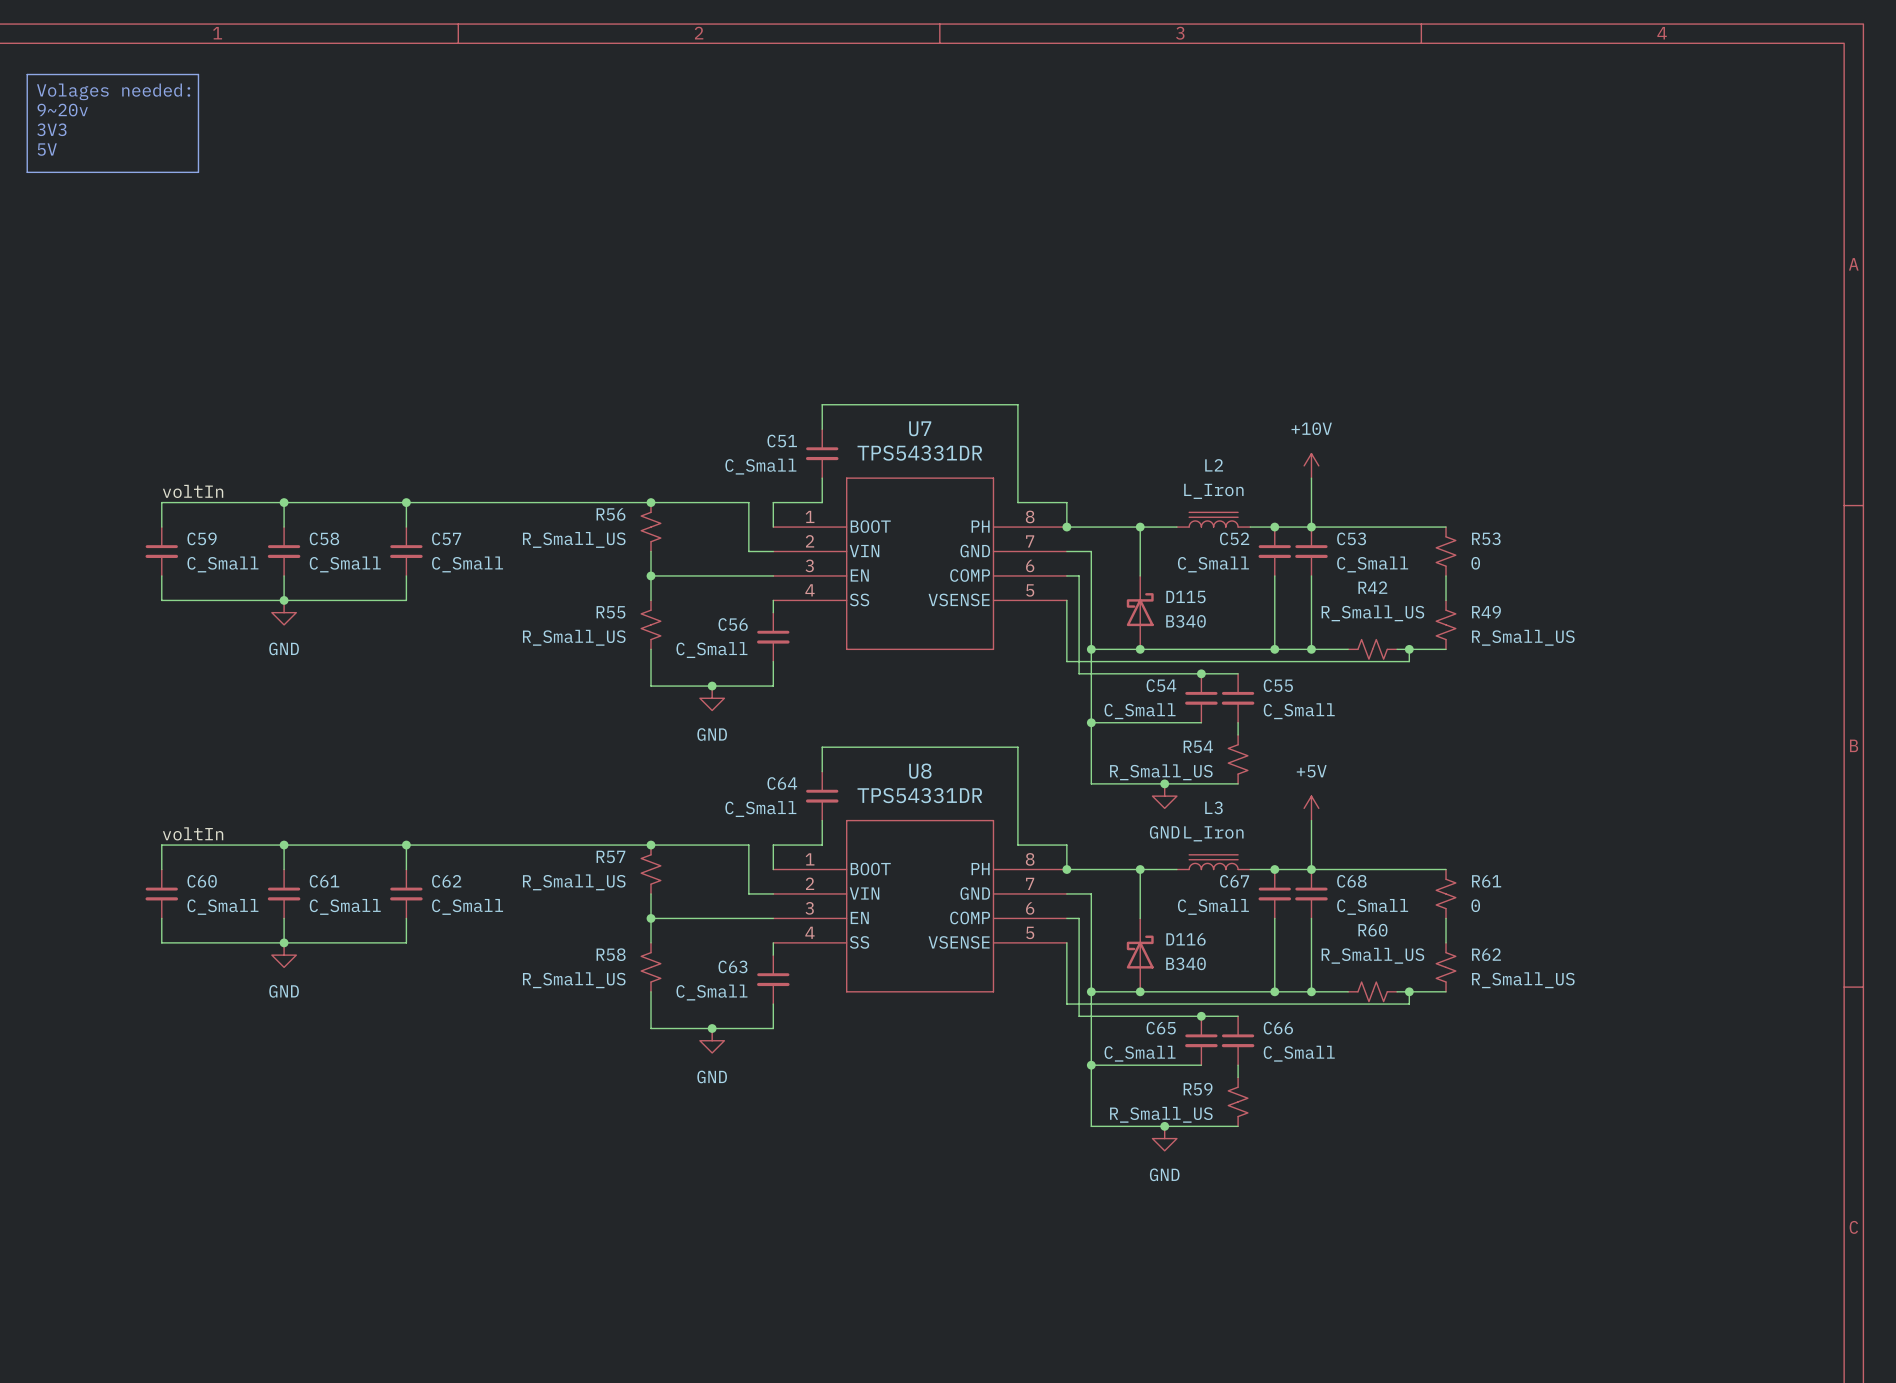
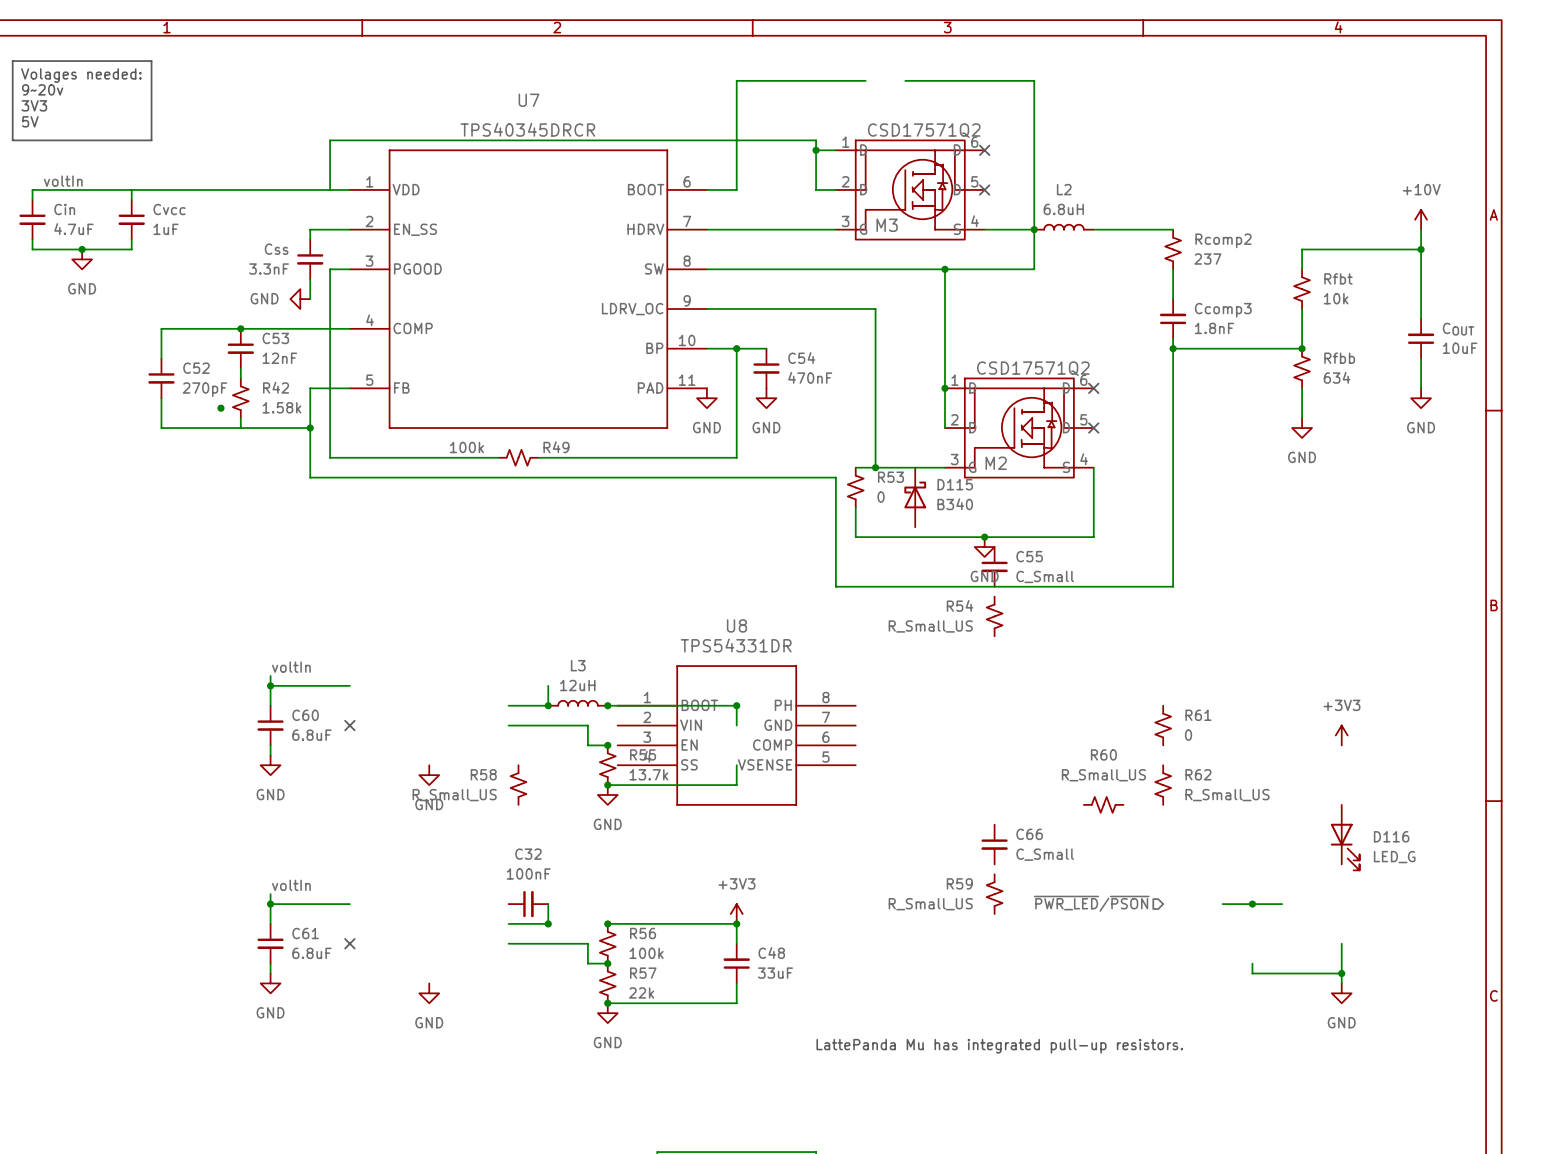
wire: none -> (865, 80) (736, 80) (736, 189) (706, 189)
wire: none -> (905, 80) (1034, 80) (1034, 269) (706, 269)
wire: none -> (816, 150) (835, 150)
junction: none -> (816, 150)
no-connect mark: none -> (984, 150)
label: none -> voltIn (63, 181)
wire: none -> (131, 189) (131, 199)
wire: none -> (330, 189) (330, 140) (816, 140) (816, 189) (835, 189)
wire: none -> (349, 189) (32, 189) (32, 199)
M3: none -> CSD17571Q2 (910, 189)
no-connect mark: none -> (984, 189)
Cin: none -> 4.7uF (32, 219)
Cvcc: none -> 1uF (131, 219)
power symbol: none -> +10V (1421, 219)
wire: none -> (349, 229) (310, 229) (310, 239)
wire: none -> (706, 229) (835, 229)
wire: none -> (984, 229) (1034, 229)
junction: none -> (1034, 229)
wire: none -> (1093, 229) (1173, 229)
wire: none -> (1421, 229) (1421, 318)
wire: none -> (32, 239) (32, 249) (131, 249) (131, 239)
junction: none -> (82, 249)
Rcomp2: none -> 237 (1173, 249)
wire: none -> (1421, 249) (1302, 249) (1302, 269)
junction: none -> (1421, 249)
power symbol: none -> GND (82, 259)
Css: none -> 3.3nF (310, 259)
wire: none -> (349, 269) (330, 269) (330, 457) (498, 457)
junction: none -> (944, 269)
wire: none -> (1173, 269) (1173, 299)
Rfbt: none -> 10k (1302, 289)
power symbol: none -> GND (300, 299)
wire: none -> (1302, 309) (1302, 348) (1173, 348)
Ccomp3: none -> 1.8nF (1173, 318)
junction: none -> (240, 328)
wire: none -> (349, 328) (161, 328) (161, 358)
wire: none -> (1173, 338) (1173, 586) (964, 586)
COUT: none -> 10uF (1421, 338)
U7 name position: U7 (920, 428) -> U7 (529, 100)
wire: (822, 429) (822, 404) (1017, 404) (1017, 502) (1066, 502) (1066, 527) (1176, 527) -> (944, 269) (944, 428)
wire: none -> (706, 348) (766, 348)
wire: none -> (736, 348) (736, 457) (538, 457)
junction: none -> (736, 348)
junction: none -> (1173, 348)
junction: none -> (1302, 348)
wire: none -> (1421, 358) (1421, 388)
wire: none -> (240, 368) (240, 378)
C51: C_Small (822, 453) -> none
U7 value: TPS54331DR (919, 453) -> TPS40345DRCR (527, 129)
Rfbb: none -> 634 (1302, 368)
power symbol: +10V (1311, 465) -> none
U7 symbol: [773, 477, 1067, 650] -> [349, 149, 707, 429]
wire: none -> (349, 388) (310, 388) (310, 477) (835, 477) (835, 586) (875, 586)
wire: (822, 478) (822, 502) (773, 502) (773, 527) -> none
junction: none -> (944, 388)
wire: (1311, 478) (1311, 527) -> none
no-connect mark: none -> (1093, 388)
wire: none -> (1302, 388) (1302, 418)
wire: none -> (161, 398) (161, 428) (310, 428)
power symbol: none -> GND (706, 398)
power symbol: none -> GND (766, 398)
power symbol: none -> GND (1421, 398)
label: voltIn (193, 491) -> none
L2 value: L_Iron (1213, 491) -> 6.8uH (1063, 209)
wire: (284, 502) (284, 527) -> none
wire: (406, 502) (406, 527) -> (310, 279) (310, 299)
junction position: (406, 502) -> (310, 428)
junction: (651, 502) -> none
L2 symbol: [1176, 512, 1251, 528] -> [1034, 224, 1094, 230]
wire: none -> (240, 418) (240, 428)
wire: (161, 527) (161, 502) (748, 502) (748, 551) (773, 551) -> none
R56 flip: as is (651, 527) -> left-right (607, 943)
R56 position: (651, 527) -> (607, 943)
junction: (1066, 527) -> none
wire: (1140, 527) (1140, 575) -> none
junction: (1140, 527) -> none
wire: (1250, 527) (1446, 527) -> none
M2: none -> CSD17571Q2 (1019, 428)
junction: (1274, 527) -> none
junction: (1311, 527) -> none
no-connect mark: none -> (1093, 428)
power symbol: none -> GND (1302, 428)
C52 name position: C52 (1234, 538) -> C52 (196, 368)
R56 value: R_Small_US (574, 539) -> 100k (646, 953)
C59: C_Small (161, 551) -> none
C58: C_Small (284, 551) -> none
C57: C_Small (406, 551) -> none
wire: (651, 551) (651, 600) -> none
wire: (1066, 551) (1091, 551) -> (706, 309) (875, 309) (875, 447)
C52 position: (1274, 551) -> (161, 378)
C53 position: (1311, 551) -> (240, 348)
R53 position: (1446, 551) -> (855, 487)
C52 value: C_Small (1213, 564) -> 270pF (204, 389)
C53 value: C_Small (1372, 564) -> 12nF (279, 358)
wire: (161, 575) (161, 600) (406, 600) (406, 575) -> none
wire: (284, 575) (284, 600) -> none
wire: (651, 575) (773, 575) -> none
junction: (651, 575) -> none
wire: (1079, 575) (1079, 673) (1238, 673) -> (865, 467) (944, 467)
wire: (1091, 575) (1091, 783) (1238, 783) -> none
junction: none -> (875, 467)
wire: (1274, 575) (1274, 649) -> none
wire: (1311, 575) (1311, 649) -> none
wire: (1446, 575) (1446, 600) -> none
R42 name position: R42 (1372, 587) -> R42 (276, 387)
junction: (284, 600) -> none
wire: (773, 600) (773, 612) -> none
power symbol: GND (284, 612) -> none
R42 value: R_Small_US (1372, 613) -> 1.58k (281, 407)
R55 flip: as is (651, 624) -> left-right (607, 765)
R55 position: (651, 624) -> (607, 765)
R49 rotation: 0° (1446, 624) -> 90° clockwise (518, 457)
R49 position: (1446, 624) -> (518, 457)
R55 value: R_Small_US (574, 637) -> 13.7k (648, 774)
C56: C_Small (773, 637) -> none
R49 value: R_Small_US (1523, 637) -> 100k (466, 447)
wire: (651, 649) (651, 686) (773, 686) (773, 661) -> none
wire: (1091, 649) (1348, 649) -> none
junction: (1091, 649) -> none
junction: (1140, 649) -> none
junction: (1274, 649) -> none
junction: (1311, 649) -> none
R42 rotation: 0° (1372, 649) -> 90° clockwise (240, 398)
R42 position: (1372, 649) -> (240, 398)
wire: (1397, 649) (1446, 649) -> none
wire: (1409, 649) (1409, 661) (1360, 661) -> (1093, 467) (1093, 537)
junction: (1409, 649) -> none
junction: none -> (984, 537)
junction: (1201, 673) -> none
C54 name position: C54 (1161, 685) -> C54 (801, 358)
junction: (712, 686) -> none
power symbol: GND (712, 698) -> none
C54 position: (1201, 698) -> (766, 368)
C54 value: C_Small (1140, 711) -> 470nF (810, 377)
junction: (1091, 722) -> none
wire: (1238, 722) (1238, 734) -> none
wire: (822, 771) (822, 747) (1017, 747) (1017, 845) (1066, 845) (1066, 869) (1176, 869) -> none
junction: (1164, 783) -> none
C64: C_Small (822, 796) -> none
power symbol position: GND (1164, 796) -> GND (984, 547)
power symbol: +5V (1311, 808) -> none
wire: (822, 820) (822, 845) (773, 845) (773, 869) -> none
wire: (1311, 820) (1311, 869) -> none
label: none -> voltIn (291, 667)
wire: none -> (270, 675) (270, 705)
label: voltIn (193, 833) -> none
L3 value: L_Iron (1213, 833) -> 12uH (577, 685)
wire: (284, 845) (284, 869) -> none
junction: (284, 845) -> none
wire: (345, 845) (161, 845) (161, 869) -> none
junction: none -> (270, 685)
wire: (406, 845) (406, 869) -> none
junction: (406, 845) -> none
wire: (443, 845) (748, 845) (748, 893) (773, 893) -> none
junction: (651, 845) -> none
wire: none -> (548, 685) (548, 705) (508, 705)
L3 symbol: [1176, 854, 1251, 870] -> [548, 700, 608, 706]
R57 flip: as is (651, 869) -> left-right (607, 983)
R57 position: (651, 869) -> (607, 983)
junction: none -> (548, 705)
wire: none -> (607, 705) (736, 705) (736, 725)
junction: none -> (607, 705)
junction: none -> (736, 705)
junction: (1066, 869) -> none
wire: (1140, 869) (1140, 918) -> none
junction: (1140, 869) -> none
wire: (1250, 869) (1446, 869) -> none
junction: (1274, 869) -> none
junction: (1311, 869) -> none
R57 value: R_Small_US (574, 882) -> 22k (641, 992)
C60 position: (161, 893) -> (270, 725)
C61 position: (284, 893) -> (270, 943)
C62: C_Small (406, 893) -> none
no-connect mark: none -> (349, 725)
wire: (651, 893) (651, 942) -> none
wire: (1066, 893) (1091, 893) (1091, 1126) (1238, 1126) -> none
C67: C_Small (1274, 893) -> none
C68: C_Small (1311, 893) -> none
C60 value: C_Small (222, 906) -> 6.8uF (311, 735)
C61 value: C_Small (345, 906) -> 6.8uF (311, 953)
power symbol: none -> +3V3 (1341, 735)
wire: (161, 918) (161, 942) (406, 942) (406, 918) -> none
wire: (284, 918) (284, 942) -> none
wire: none -> (270, 745) (270, 755)
wire: (651, 918) (736, 918) -> (508, 725) (587, 725) (587, 745)
junction: (651, 918) -> none
wire: (761, 918) (773, 918) -> none
junction: none -> (607, 745)
wire: (1066, 918) (1079, 918) (1079, 1016) (1238, 1016) -> none
D116 symbol: [1126, 918, 1154, 992] -> [1330, 804, 1360, 871]
wire: (1274, 918) (1274, 991) -> none
wire: (1311, 918) (1311, 991) -> none
wire: (1446, 918) (1446, 942) -> none
junction: (284, 942) -> none
wire: (773, 942) (773, 955) -> none
wire: none -> (736, 765) (736, 785) (607, 785)
wire: (1066, 942) (1066, 1004) (1409, 1004) (1409, 991) -> none
power symbol position: GND (284, 955) -> GND (270, 765)
power symbol: none -> GND (429, 775)
D116 value: B340 (1186, 963) -> LED_G (1394, 857)
junction: none -> (607, 785)
C63: C_Small (773, 979) -> none
wire: (651, 991) (651, 1028) (773, 1028) (773, 1004) -> none
wire: (1091, 991) (1348, 991) -> none
junction: (1091, 991) -> none
junction: (1140, 991) -> none
junction: (1274, 991) -> none
junction: (1311, 991) -> none
wire: (1397, 991) (1446, 991) -> none
junction: (1409, 991) -> none
junction: (1201, 1016) -> none
junction: (712, 1028) -> none
power symbol position: GND (712, 1040) -> GND (607, 794)
C65: C_Small (1201, 1040) -> none
wire: (1091, 1065) (1201, 1065) -> none
junction: (1091, 1065) -> none
wire: (1238, 1065) (1238, 1077) -> none
label: none -> voltIn (291, 885)
wire: none -> (270, 894) (270, 923)
hierarchical label: none -> ~{PWR_LED}/~{PSON} (1091, 903)
wire: none -> (270, 904) (349, 904)
junction: none -> (270, 904)
C32: none -> 100nF (528, 904)
wire: none -> (548, 904) (548, 923) (508, 923)
wire: none -> (1222, 904) (1282, 904)
junction: none -> (1252, 904)
power symbol: none -> +3V3 (736, 914)
junction: (1164, 1126) -> none
junction: none -> (548, 923)
wire: none -> (607, 923) (736, 923) (736, 943)
junction: none -> (607, 923)
junction: none -> (736, 923)
power symbol: GND (1164, 1138) -> none
no-connect mark: none -> (349, 943)
wire: none -> (508, 943) (587, 943) (587, 963) (607, 963)
wire: none -> (1341, 943) (1341, 983)
wire: none -> (270, 963) (270, 973)
junction: none -> (607, 963)
C48: none -> 33uF (736, 963)
wire: none -> (1252, 963) (1252, 973) (1341, 973)
junction: none -> (1341, 973)
power symbol: none -> GND (270, 983)
wire: none -> (736, 983) (736, 1003) (607, 1003)
power symbol: none -> GND (429, 993)
power symbol: none -> GND (1341, 993)
junction: none -> (607, 1003)
power symbol: none -> GND (607, 1013)
text: none -> LattePanda Mu has integrated pull-up resistors. (999, 1046)

